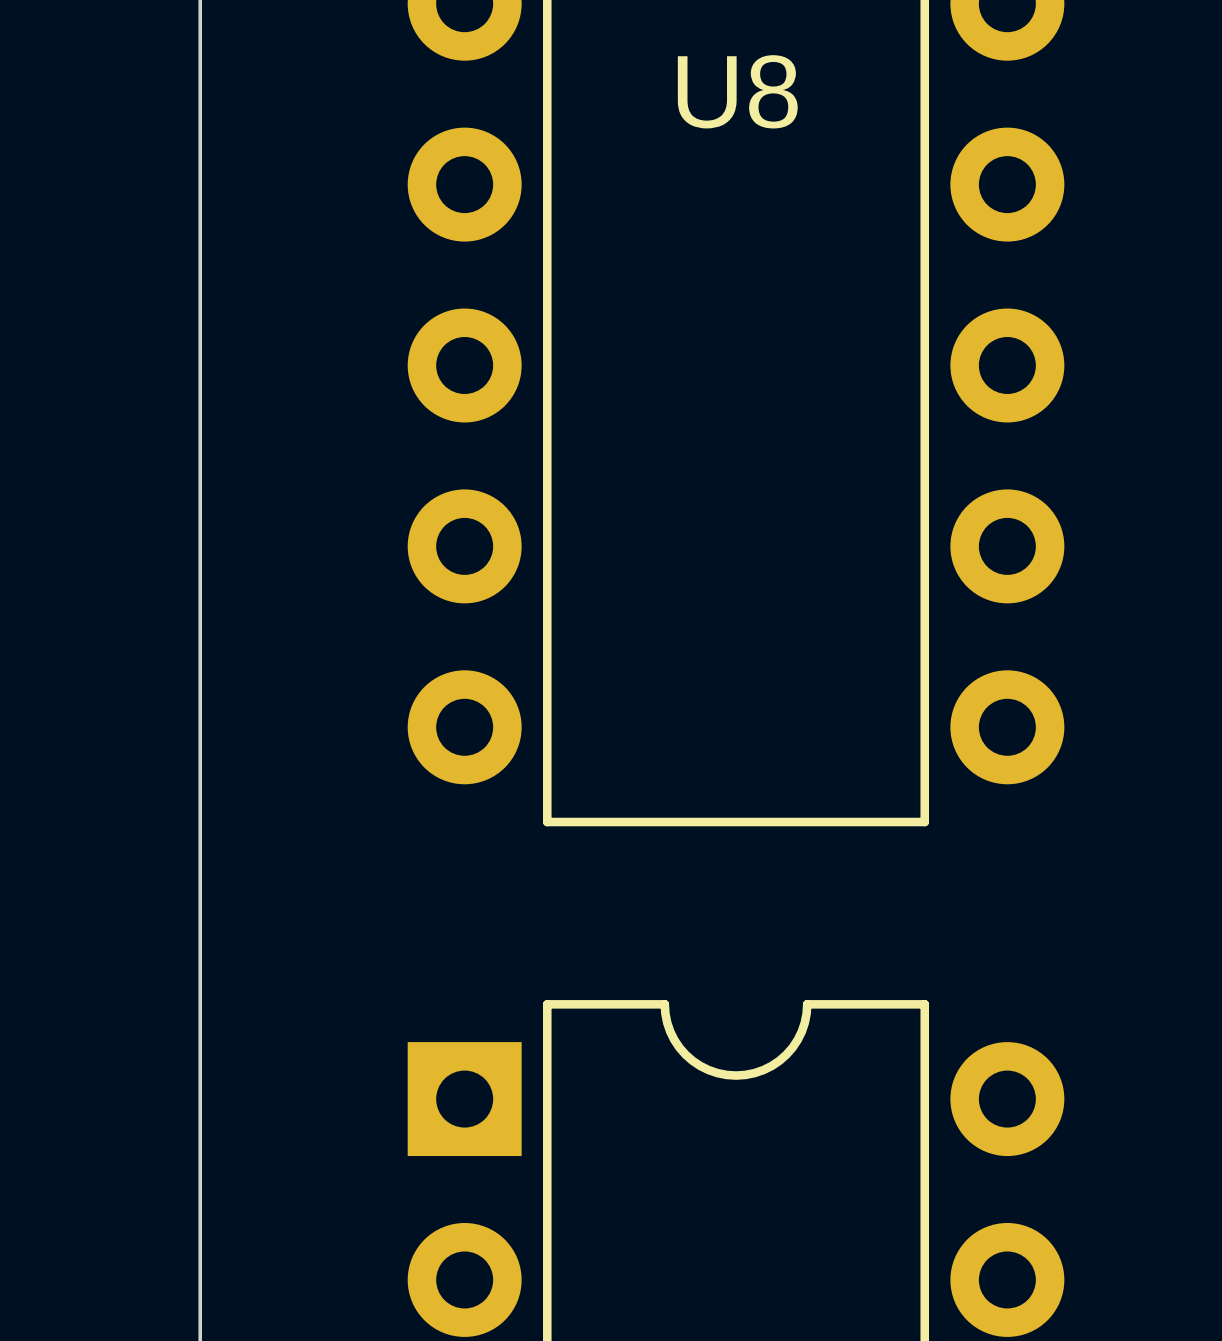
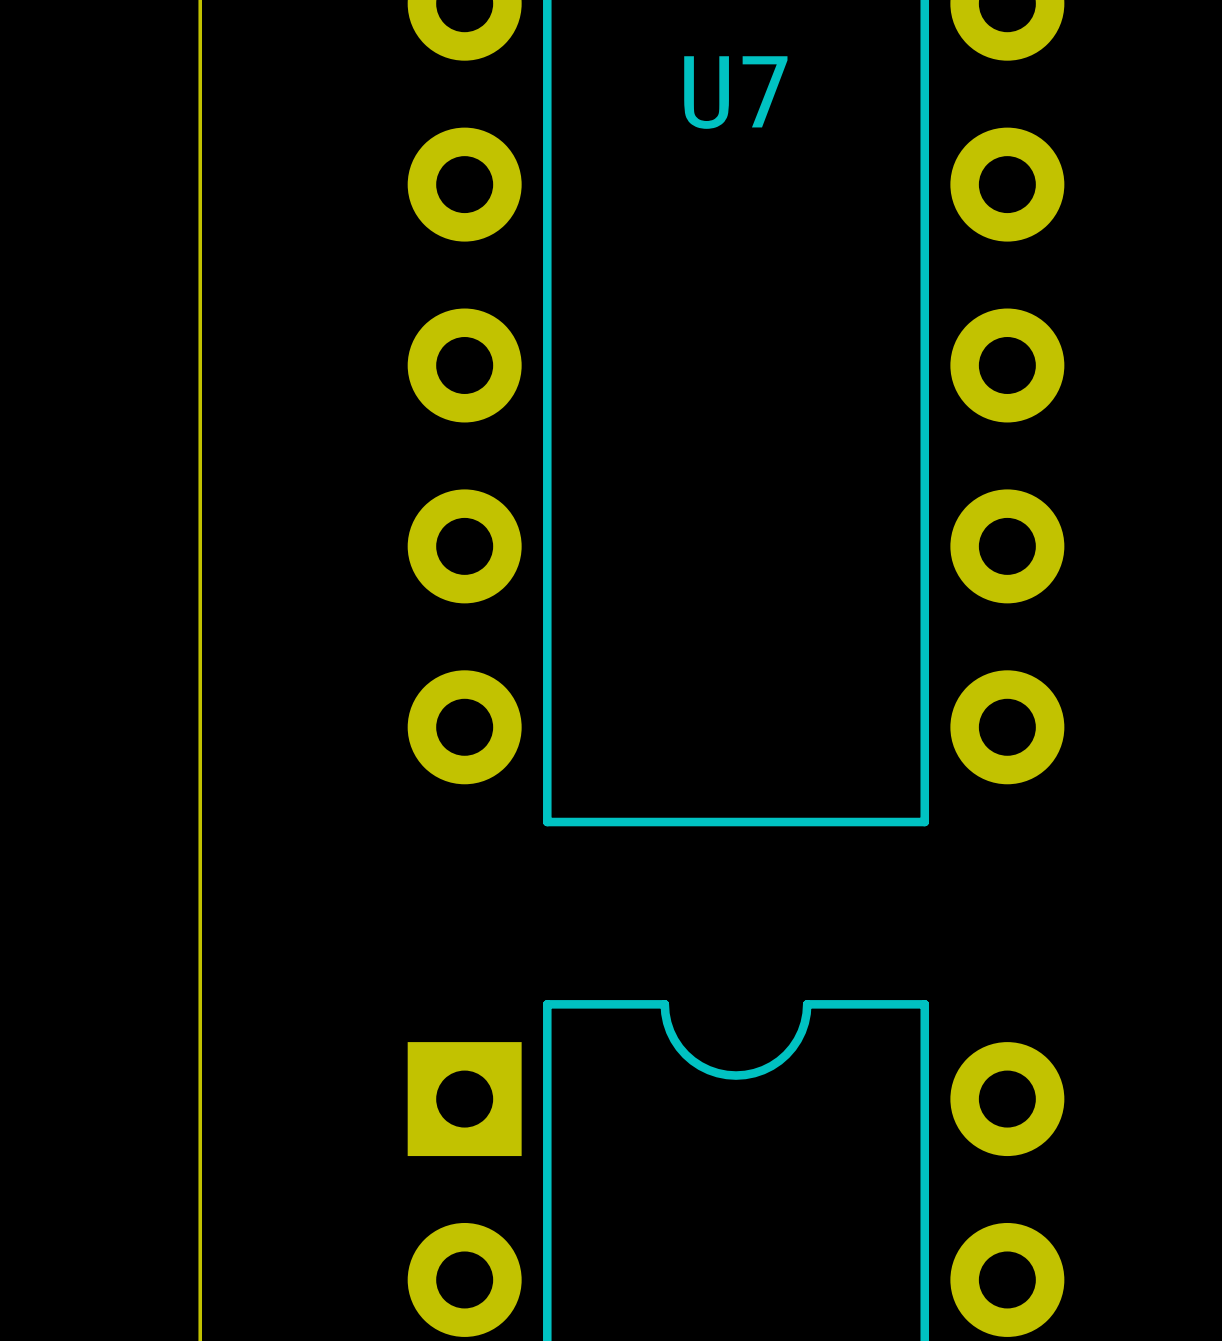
U8 name: U8 (737, 91) -> U7 (735, 92)

